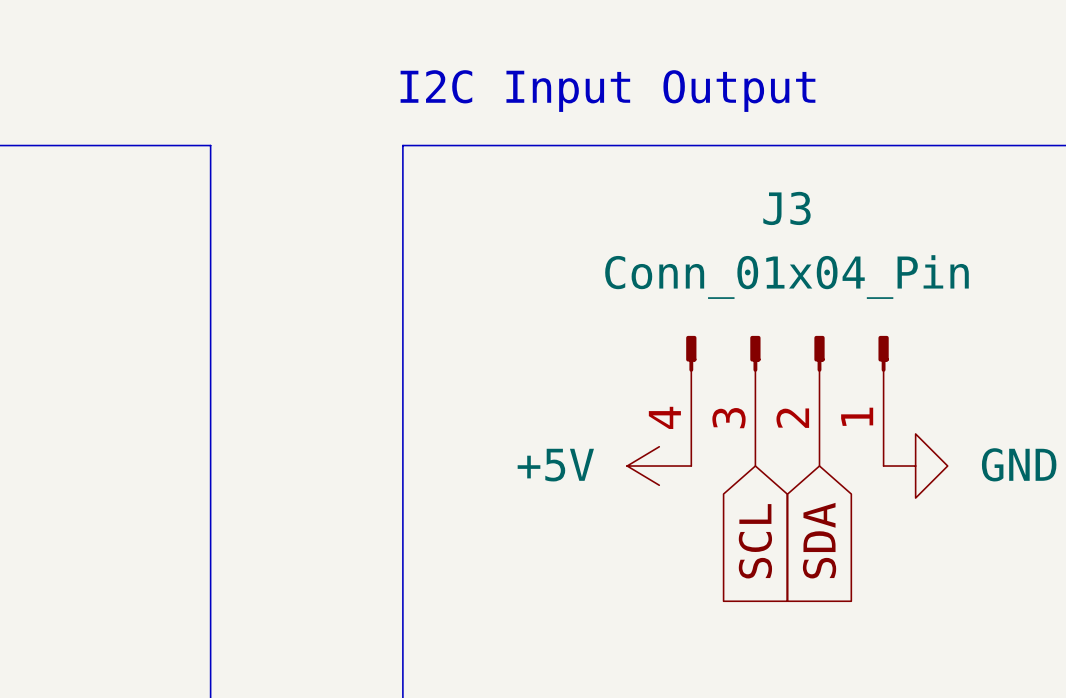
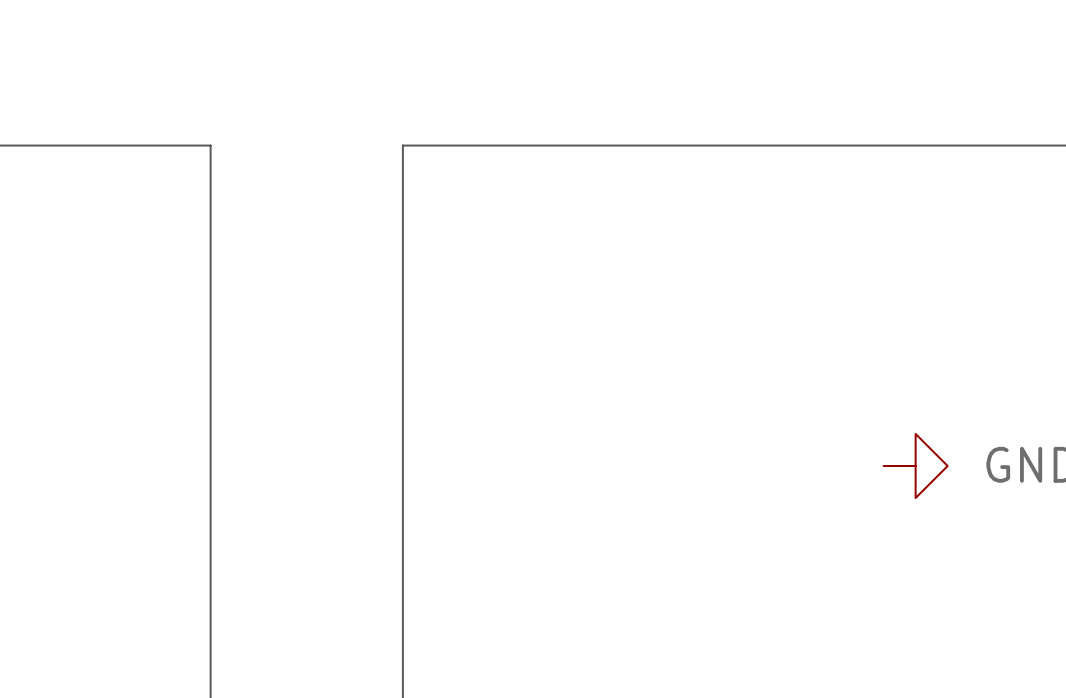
text: I2C Input Output (607, 91) -> none
J3: Conn_01x04_Pin (787, 400) -> none
power symbol: +5V (659, 466) -> none
global label: SDA (819, 540) -> none
global label: SCL (755, 541) -> none

